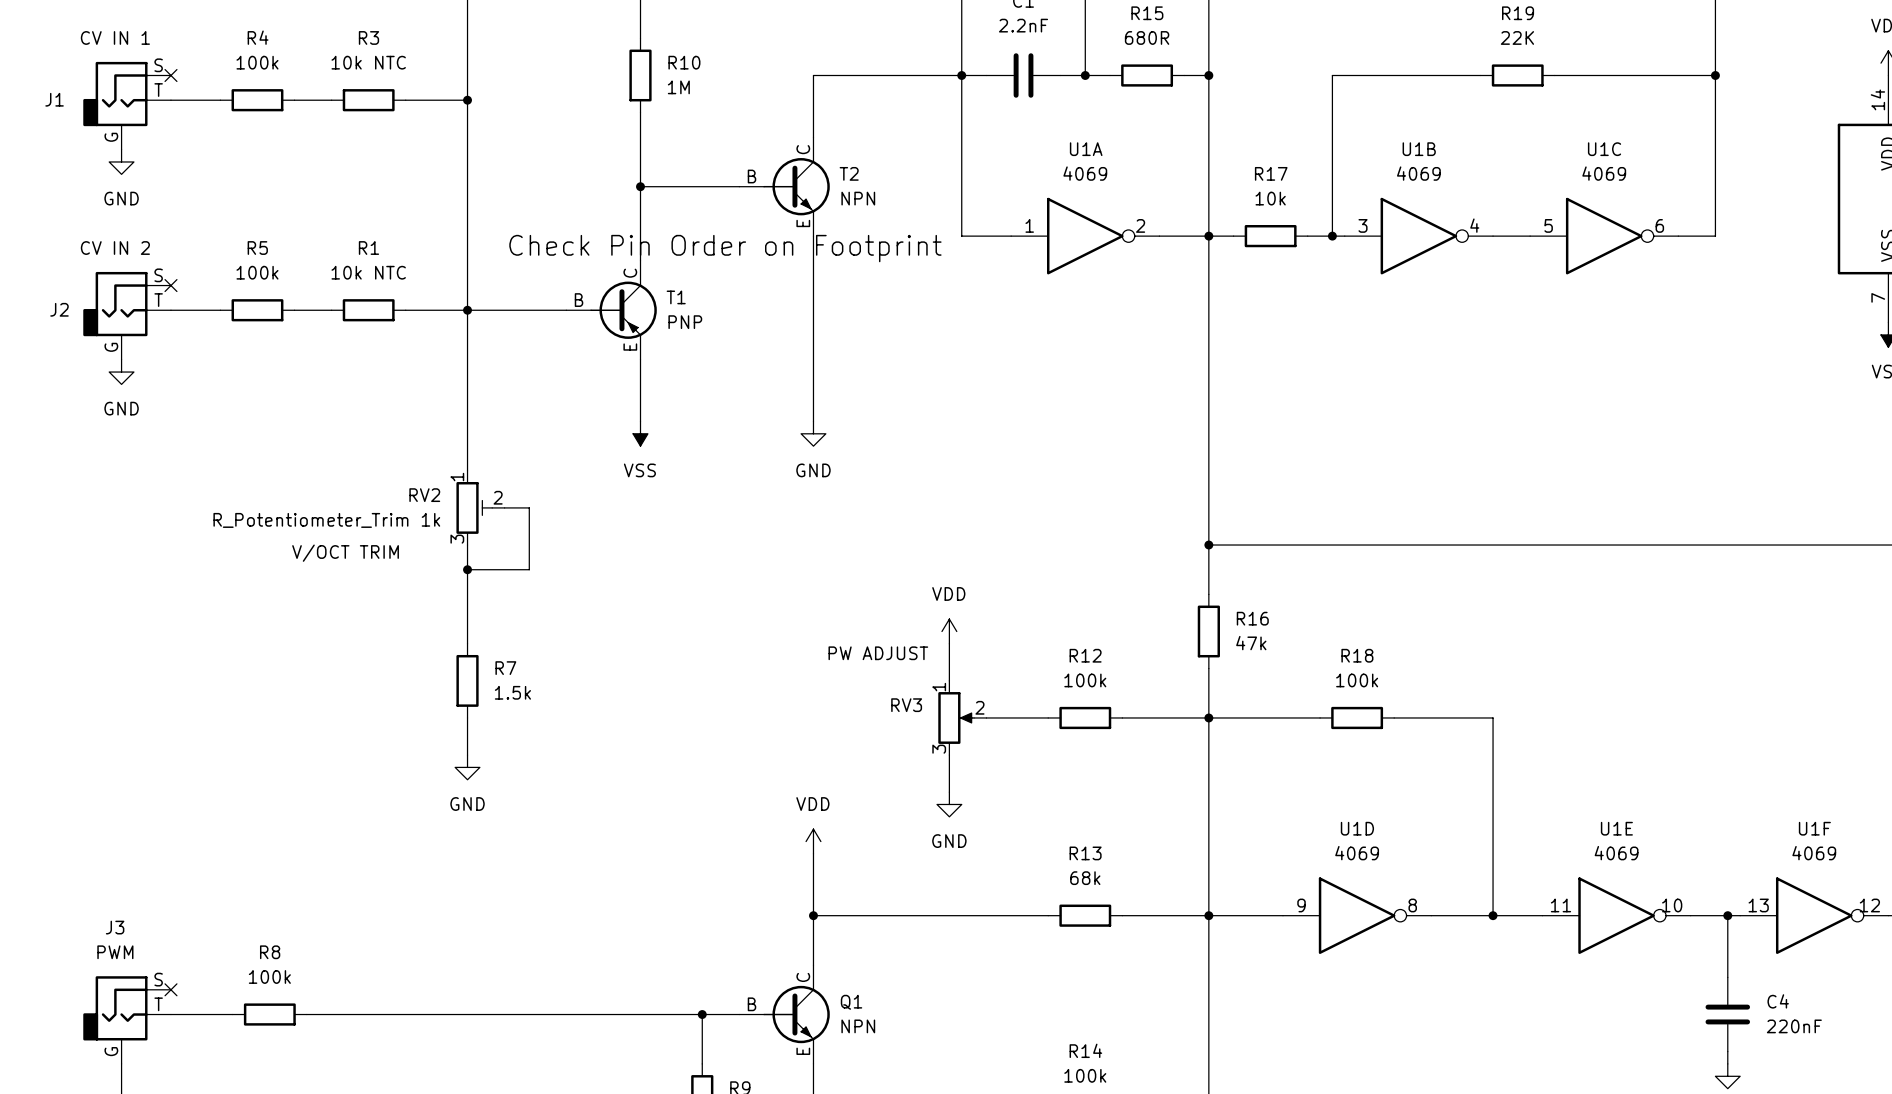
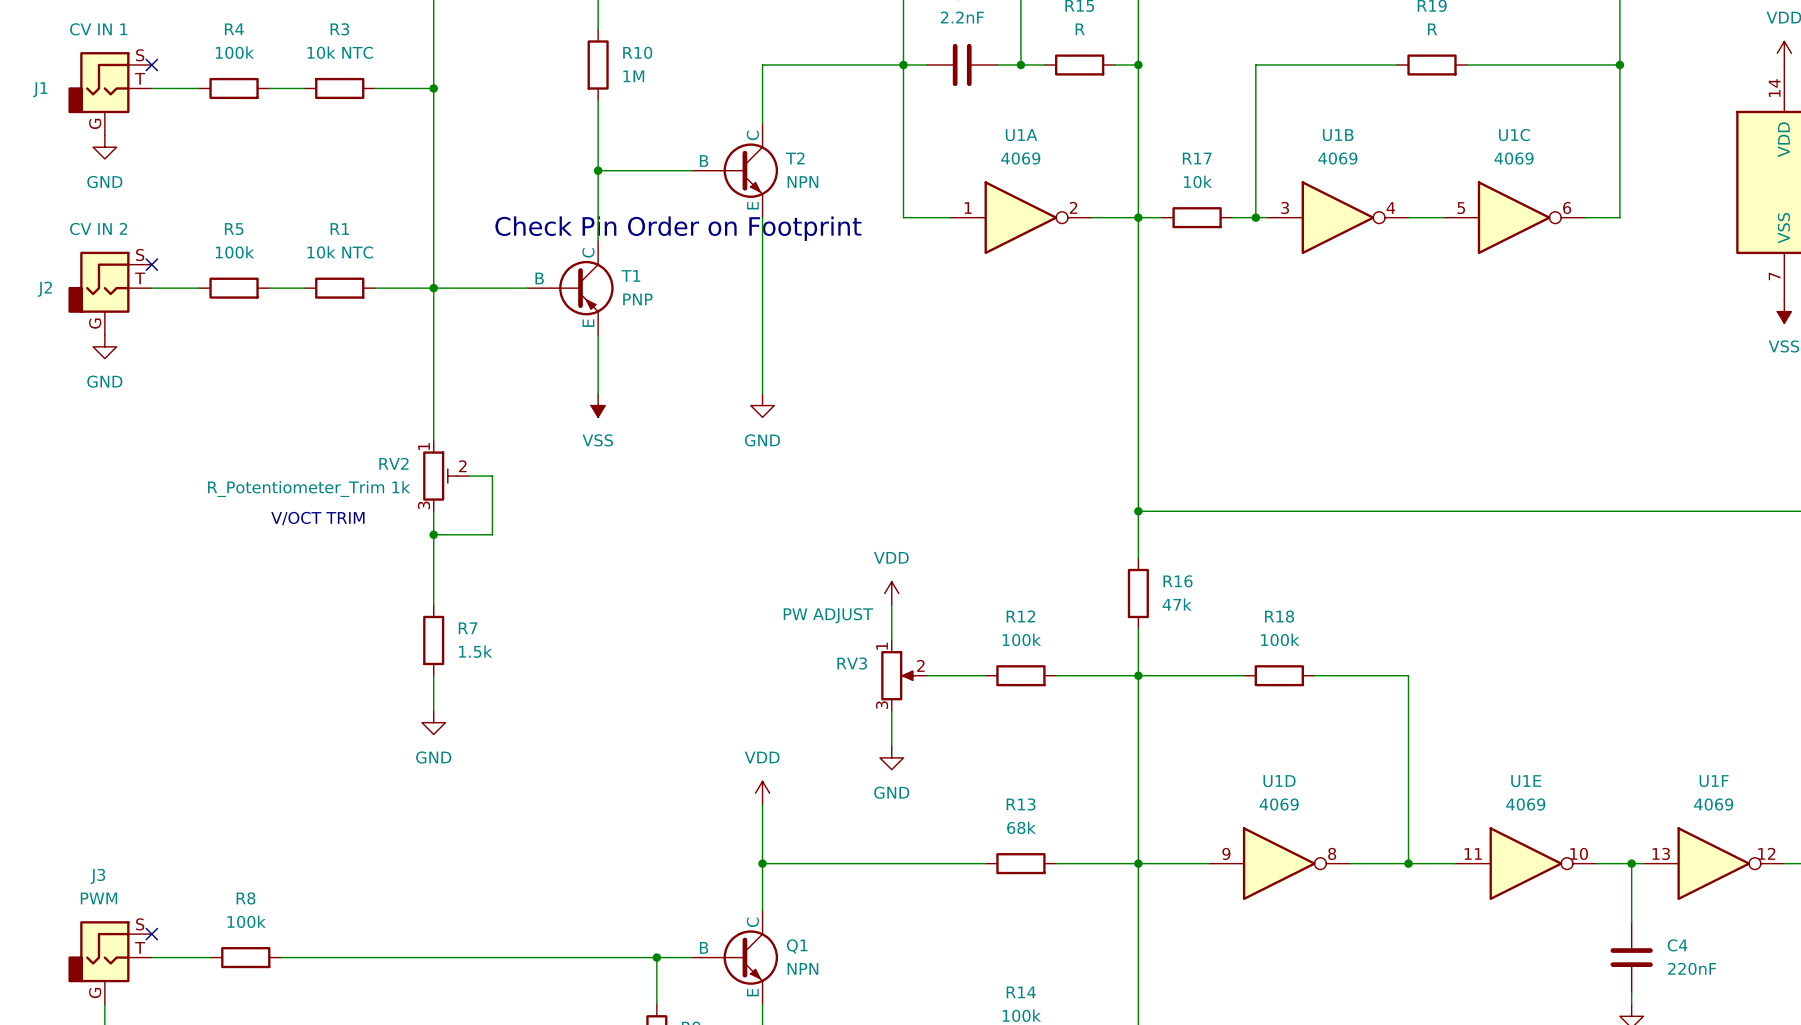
R15 value: 680R (1147, 37) -> R (1080, 29)
R19 value: 22K (1517, 37) -> R (1432, 29)

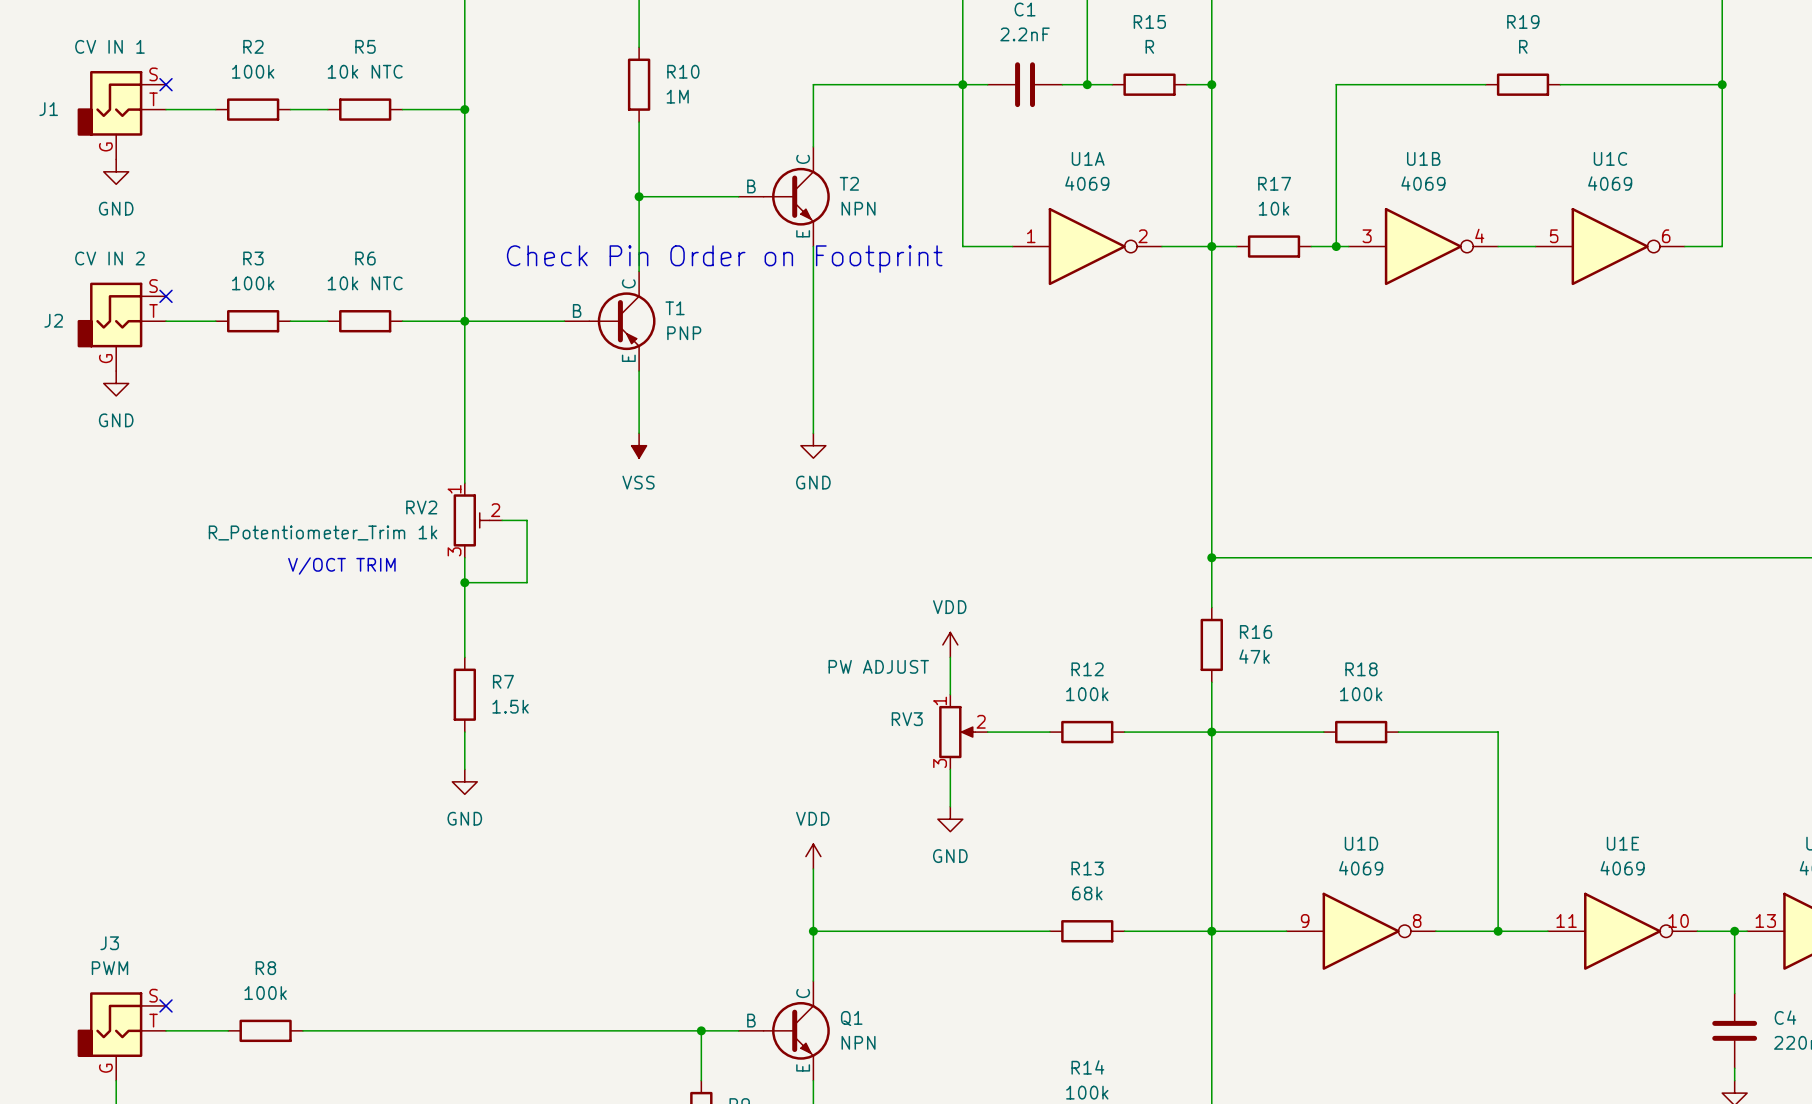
R4 name: R4 (234, 29) -> R2 (253, 46)
R3 name: R3 (339, 29) -> R5 (365, 46)
R1 name: R1 (339, 228) -> R6 (365, 258)
R5 name: R5 (234, 229) -> R3 (253, 258)

